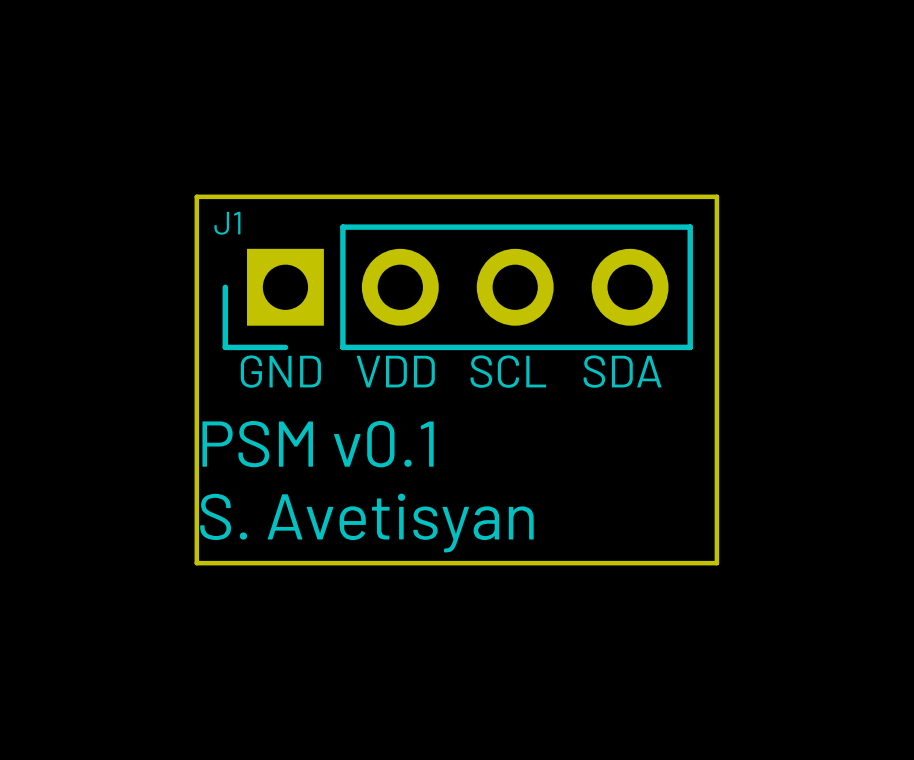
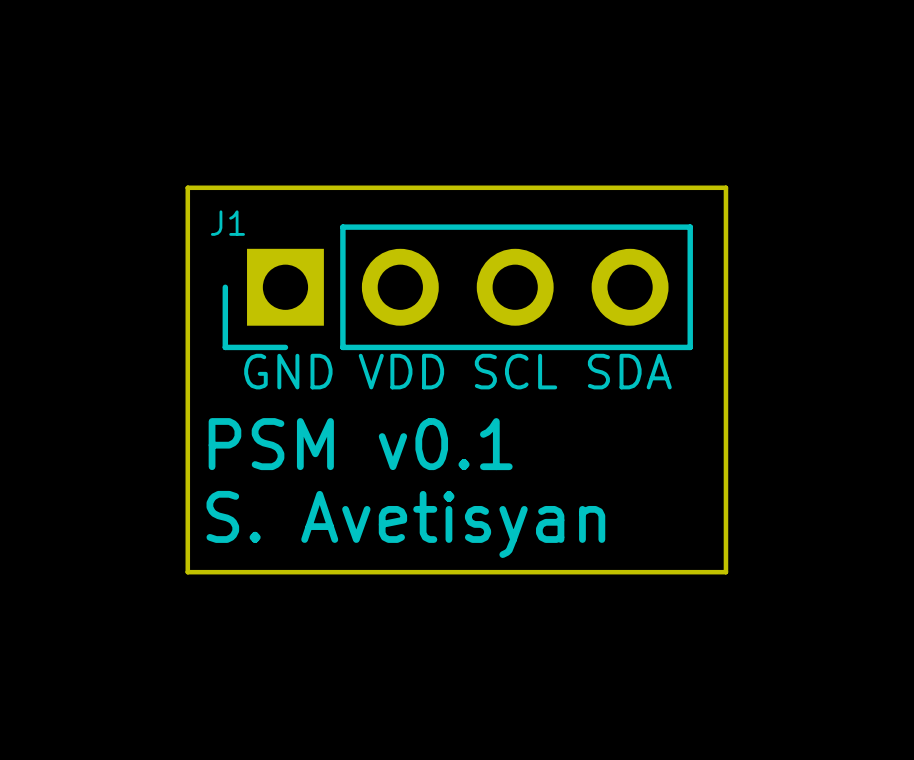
board edge: (716, 196) (196, 196) (196, 563) (716, 563) (716, 196) -> (725, 187) (725, 572) (187, 572) (187, 187) (725, 187)

